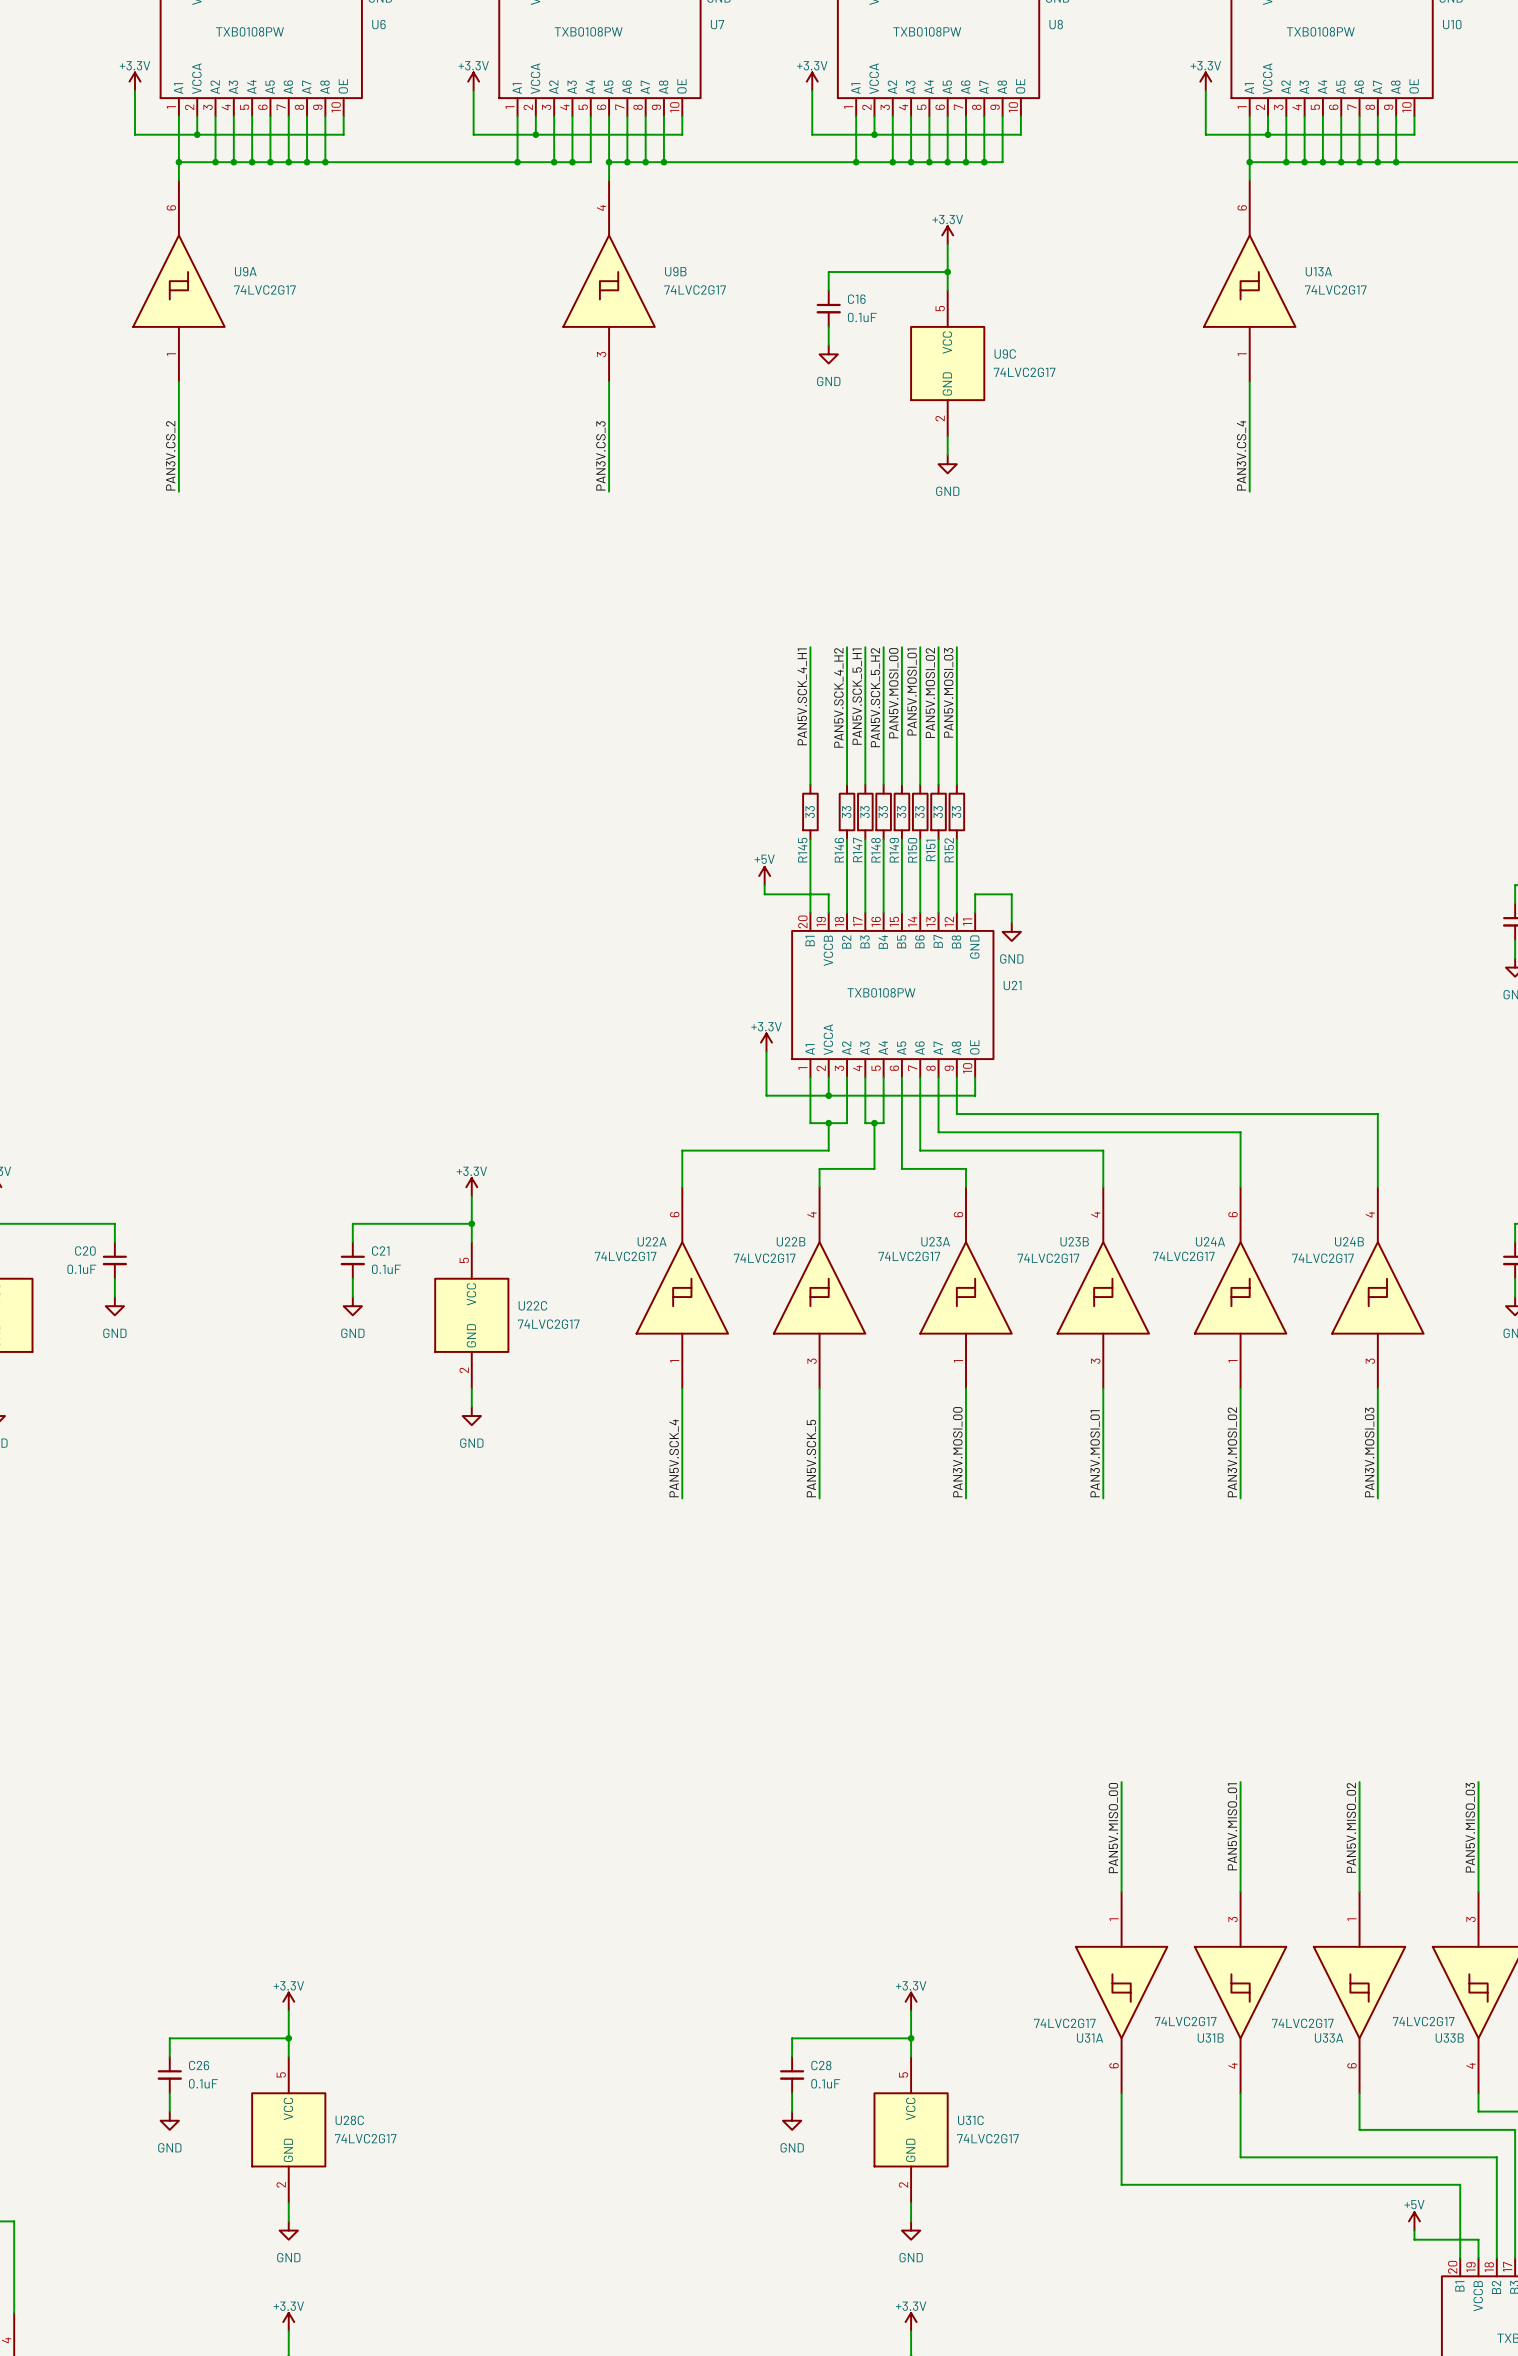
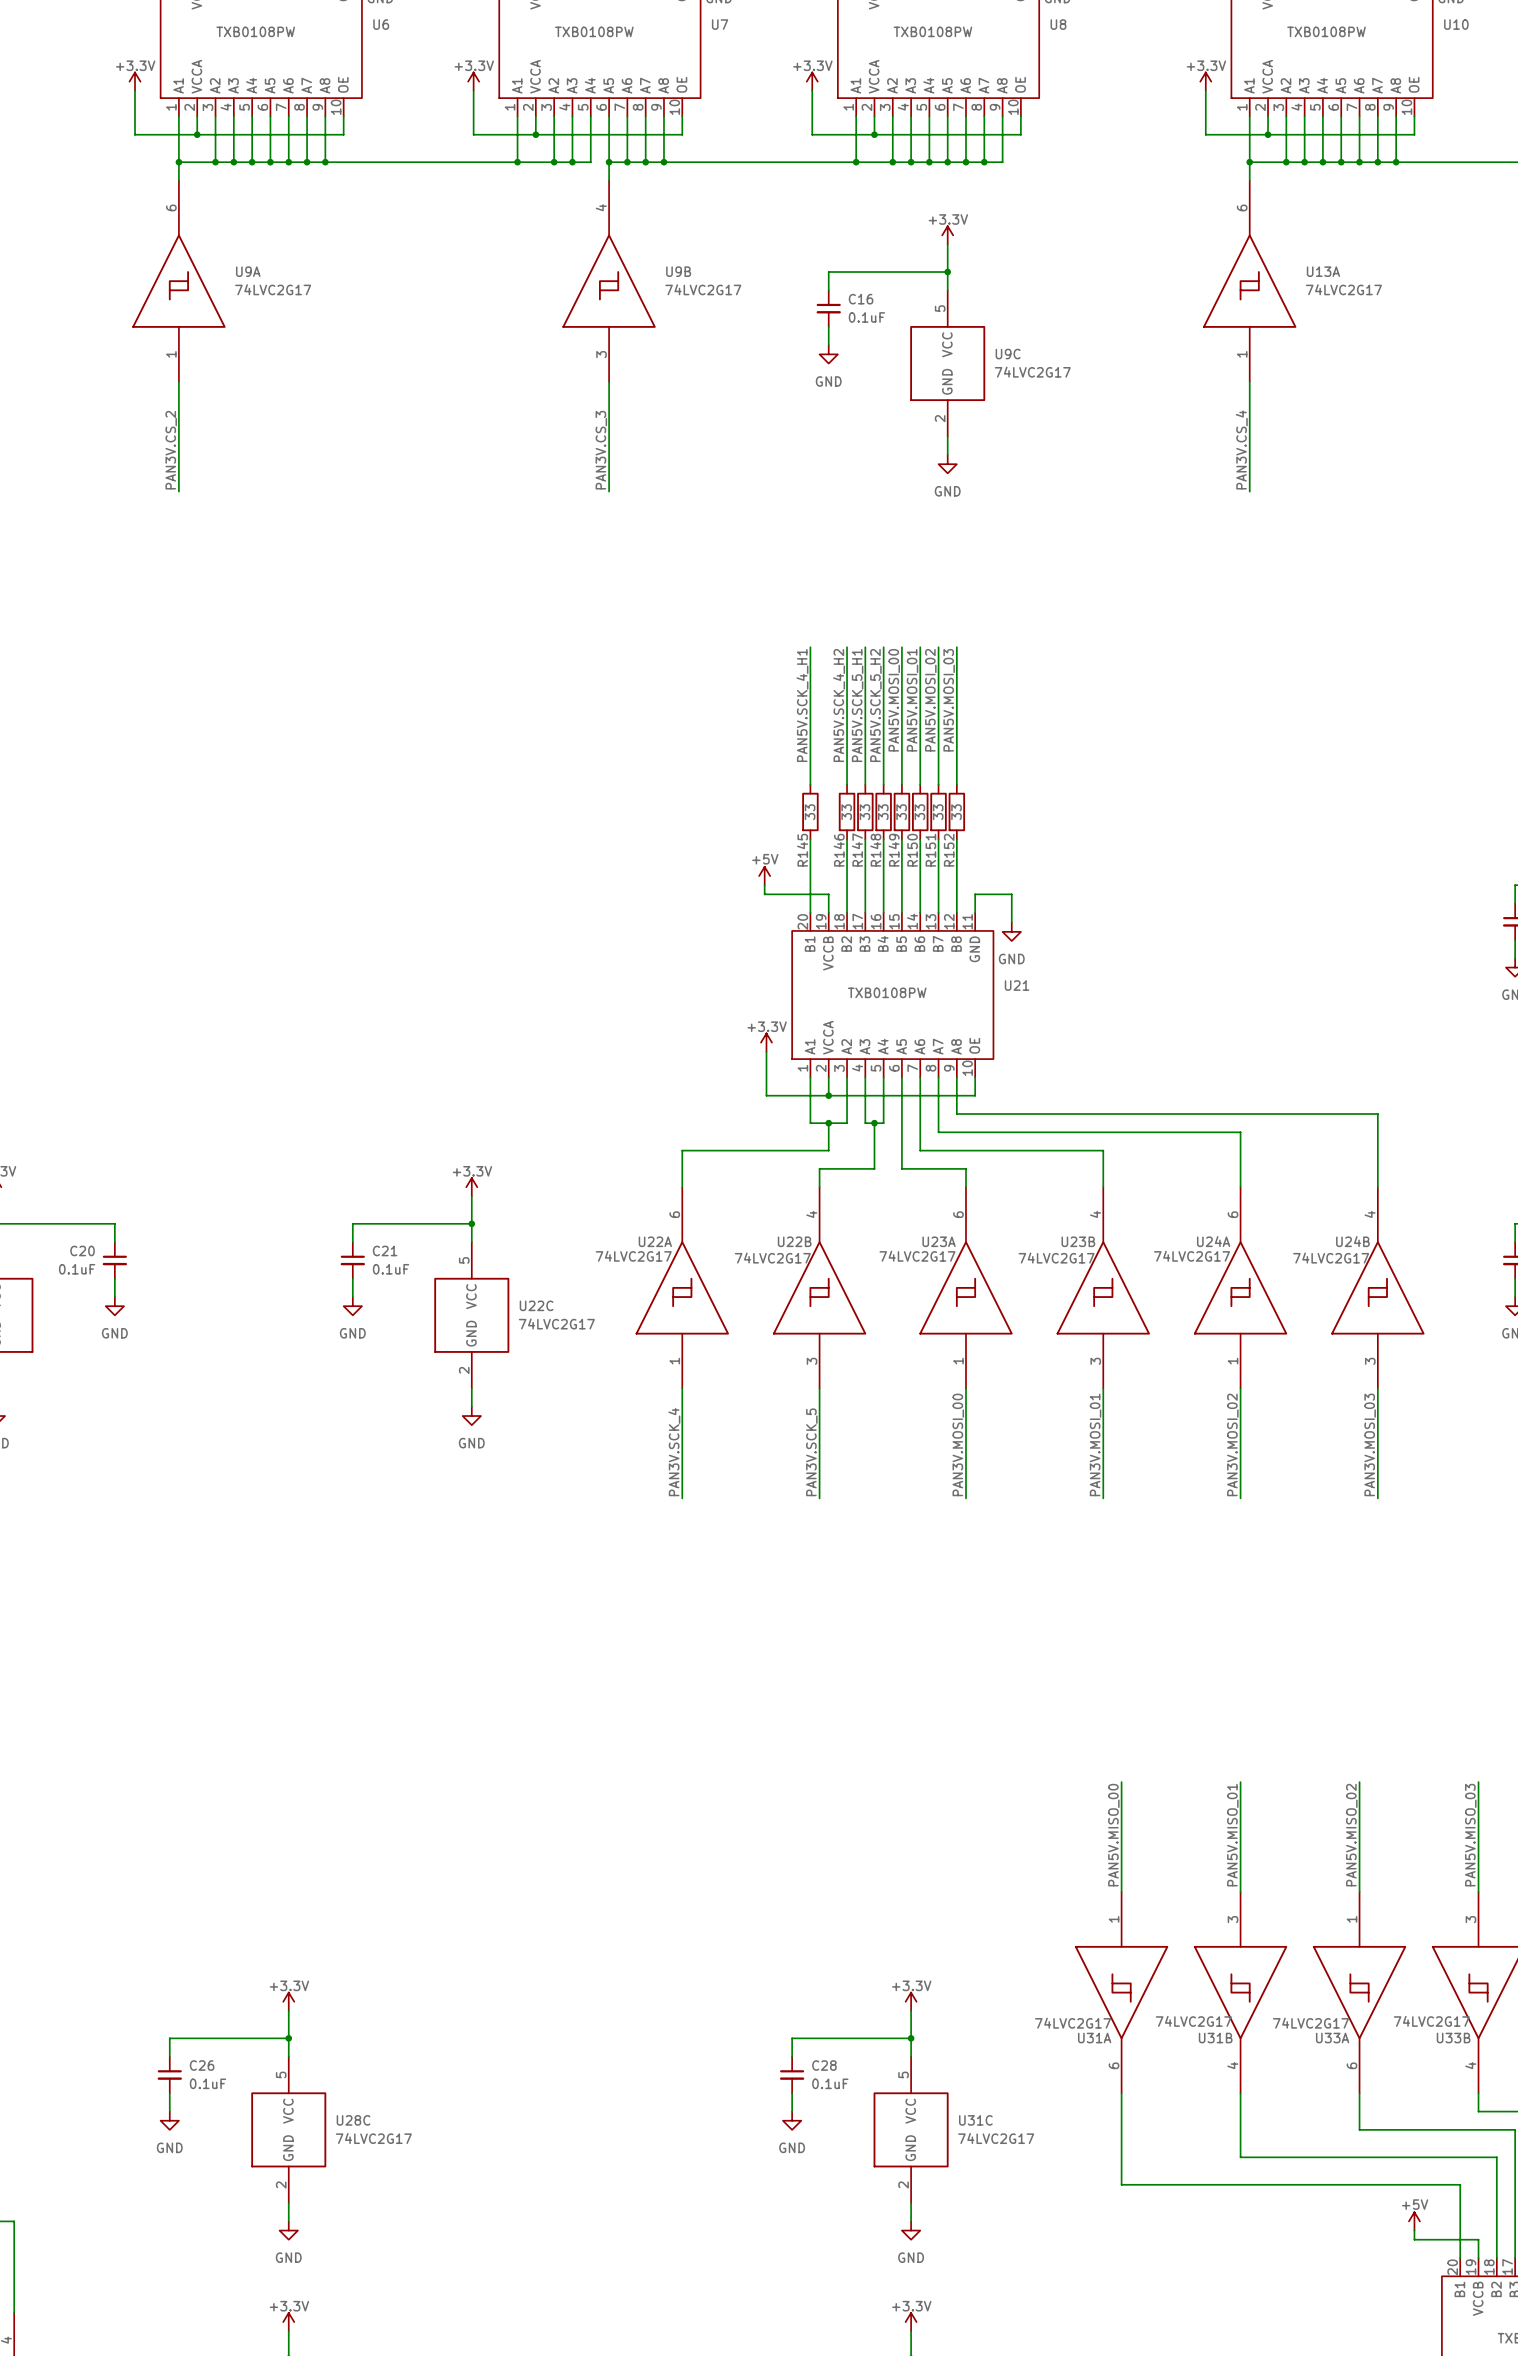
label: PAN5V.SCK_4 (674, 1458) -> PAN3V.SCK_4 (674, 1452)
label: PAN5V.SCK_5 (811, 1458) -> PAN3V.SCK_5 (811, 1452)

